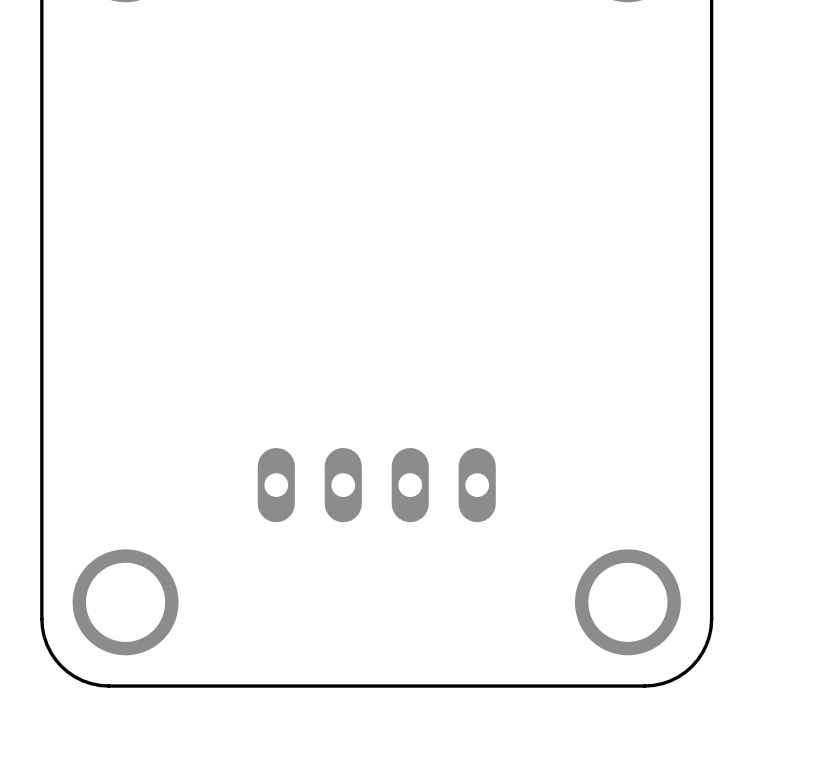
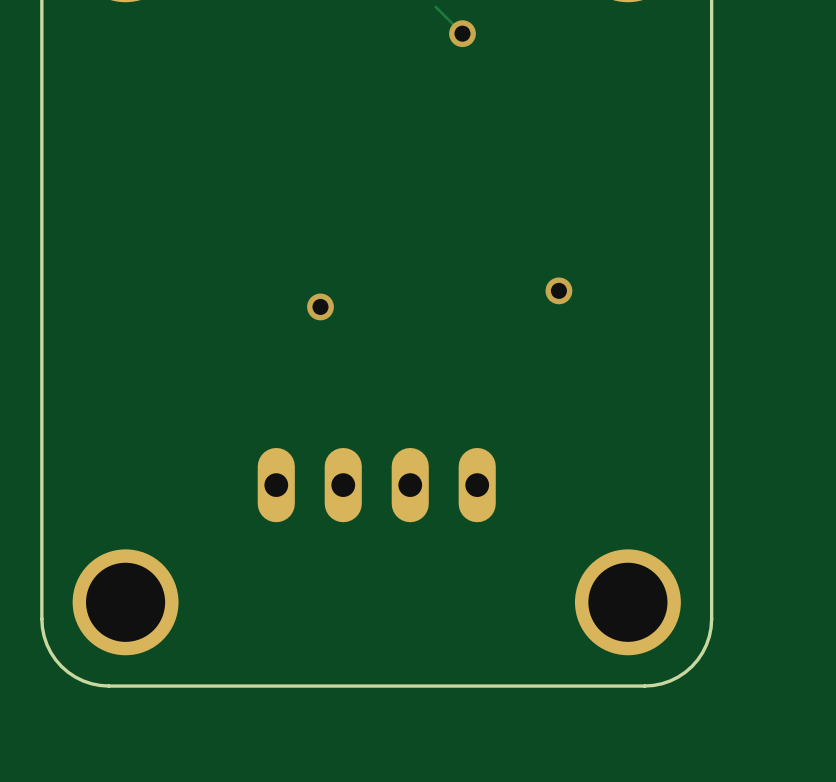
track: none -> (435, 6) (462, 33)
via: none -> (462, 33)
via: none -> (558, 290)
via: none -> (320, 306)

